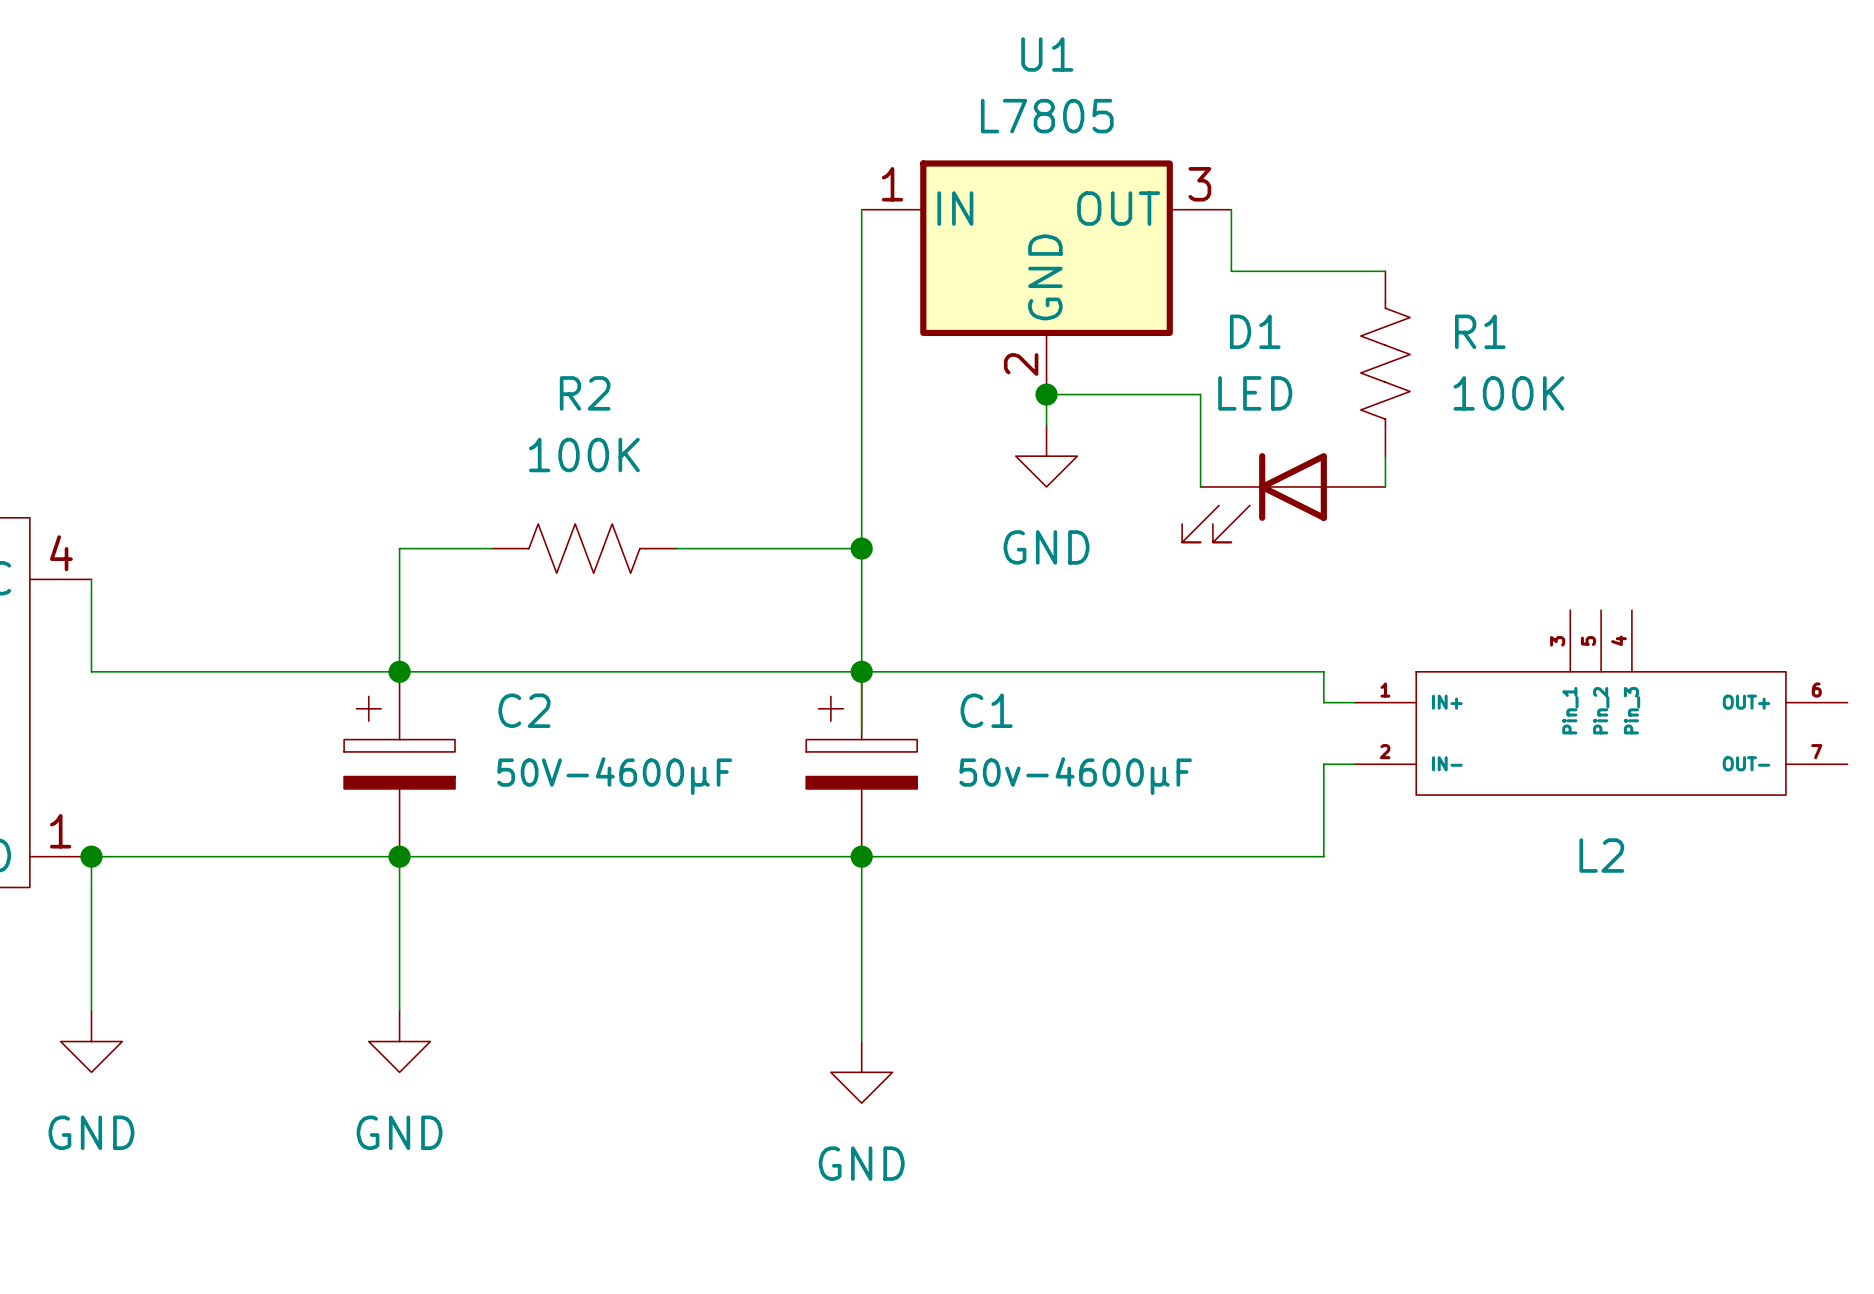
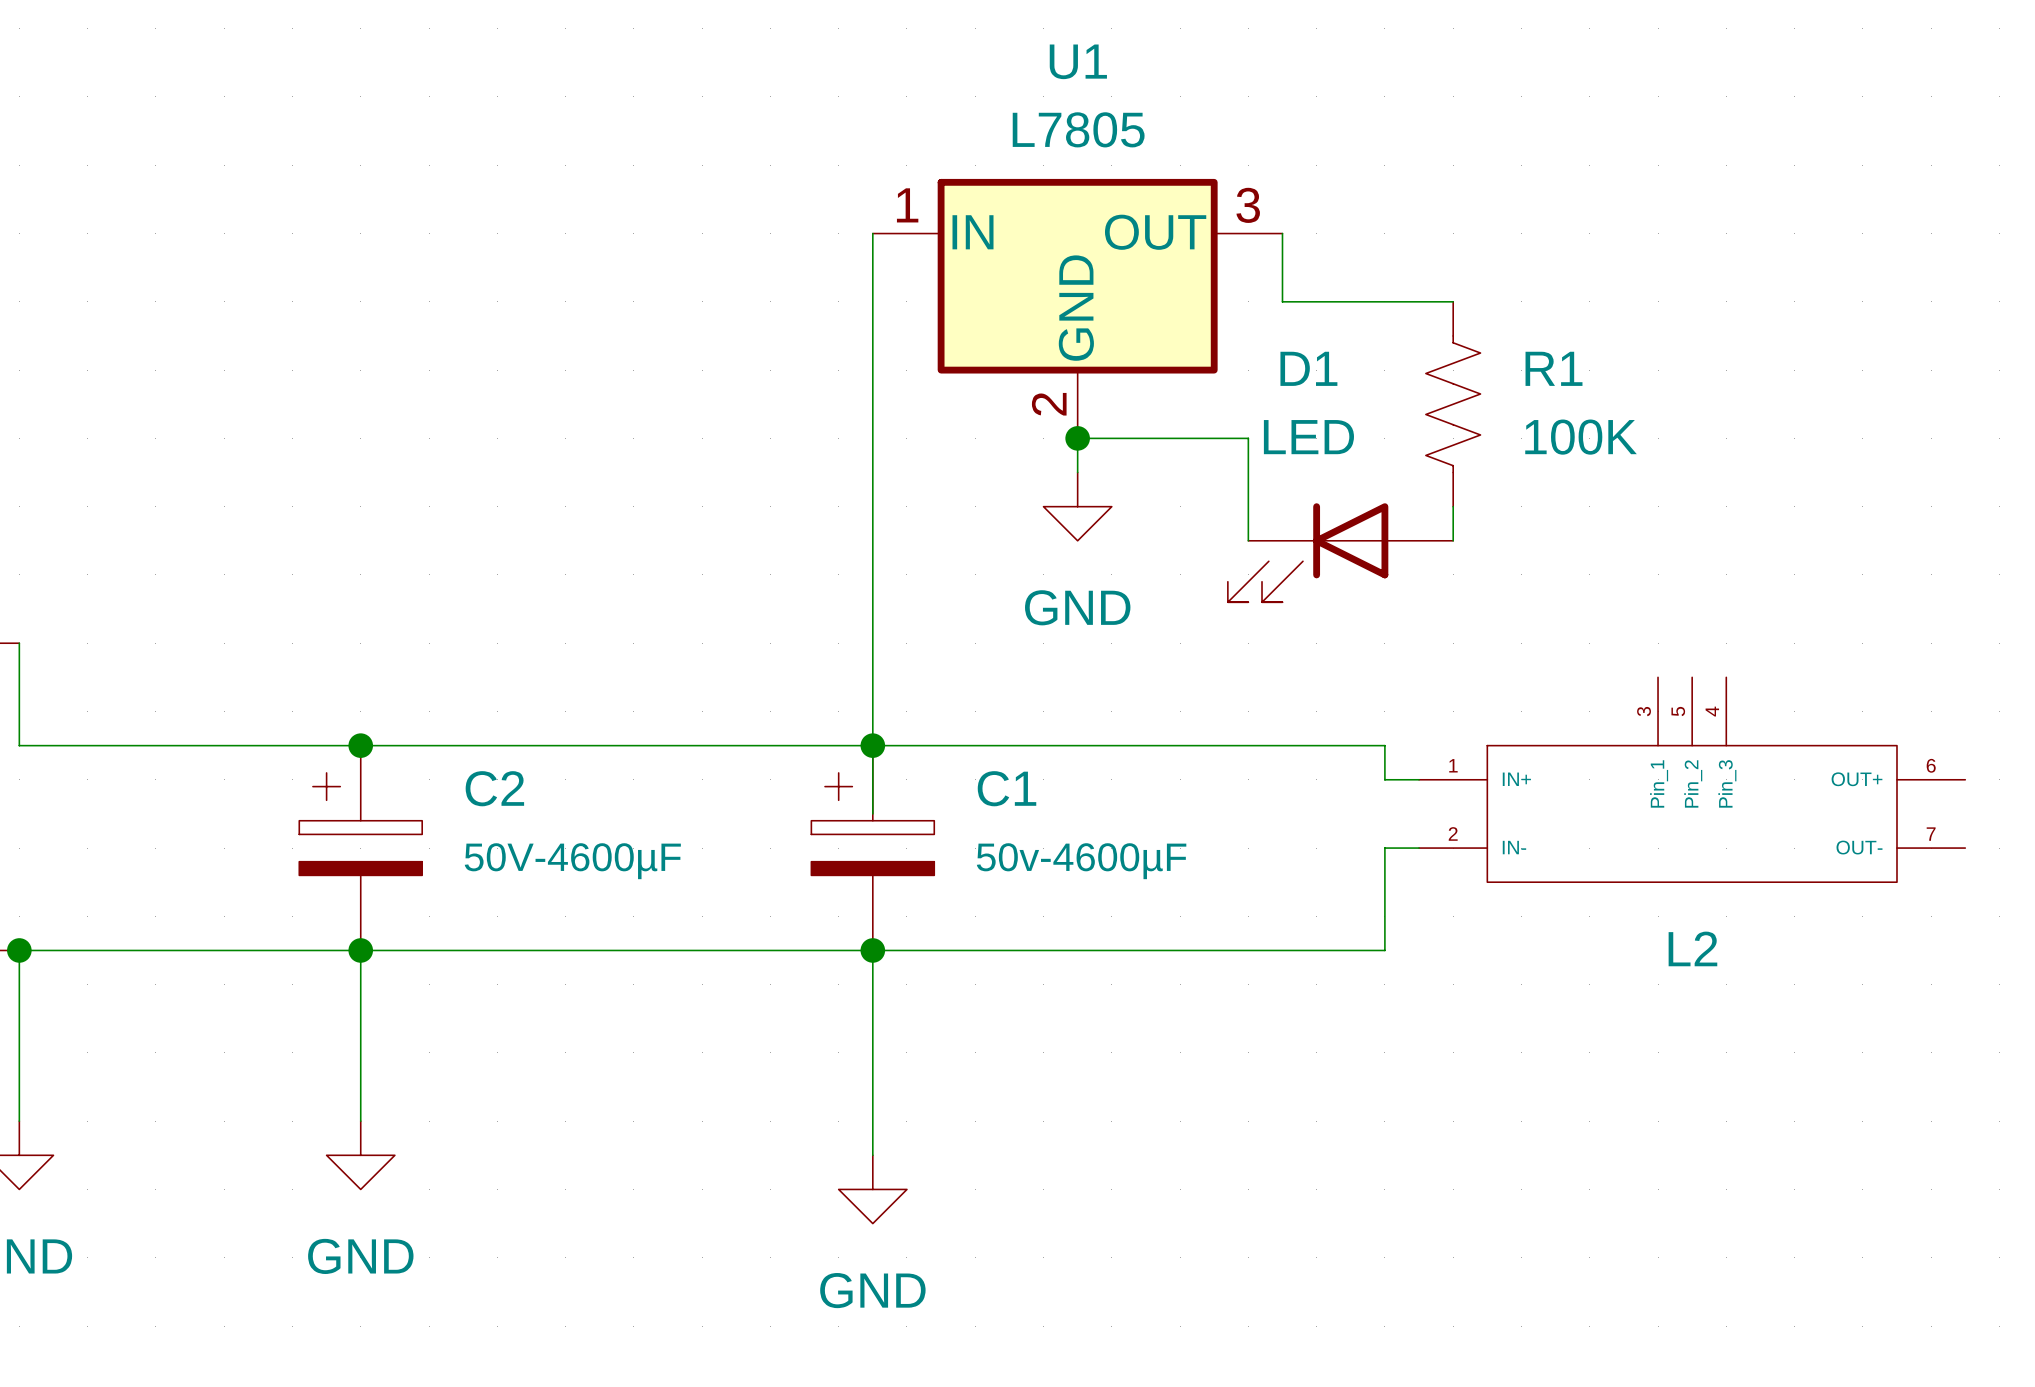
wire: (491, 548) (399, 548) (399, 671) -> none
R2: 100K (584, 548) -> none
wire: (676, 548) (861, 548) -> none
junction: (861, 548) -> none

